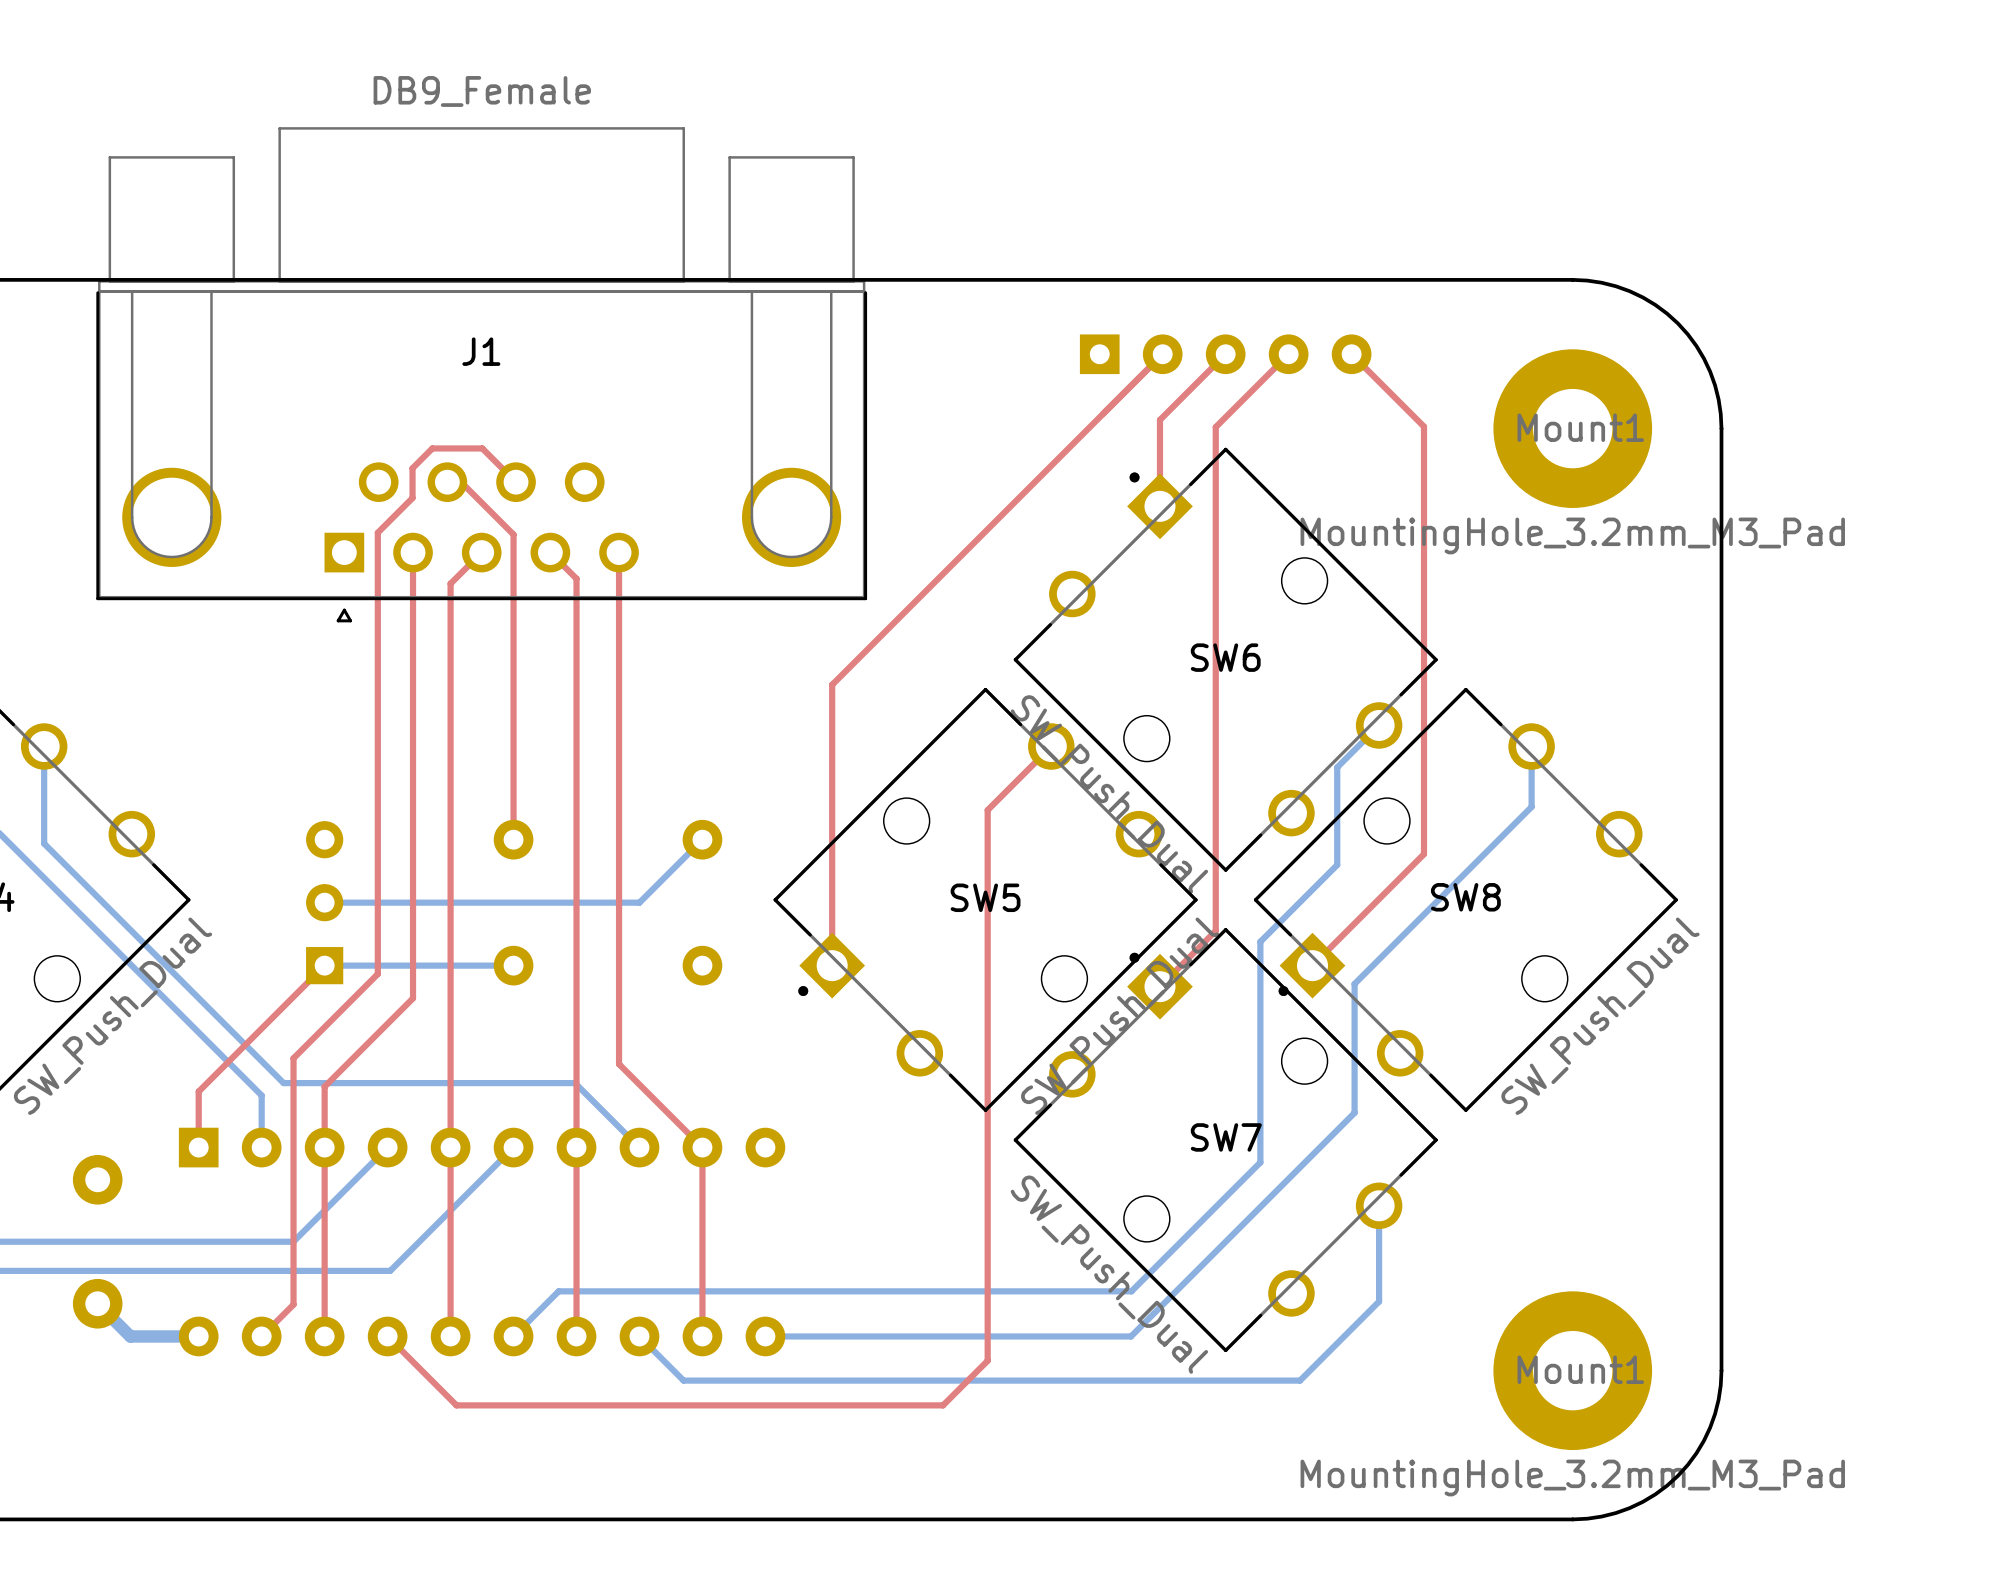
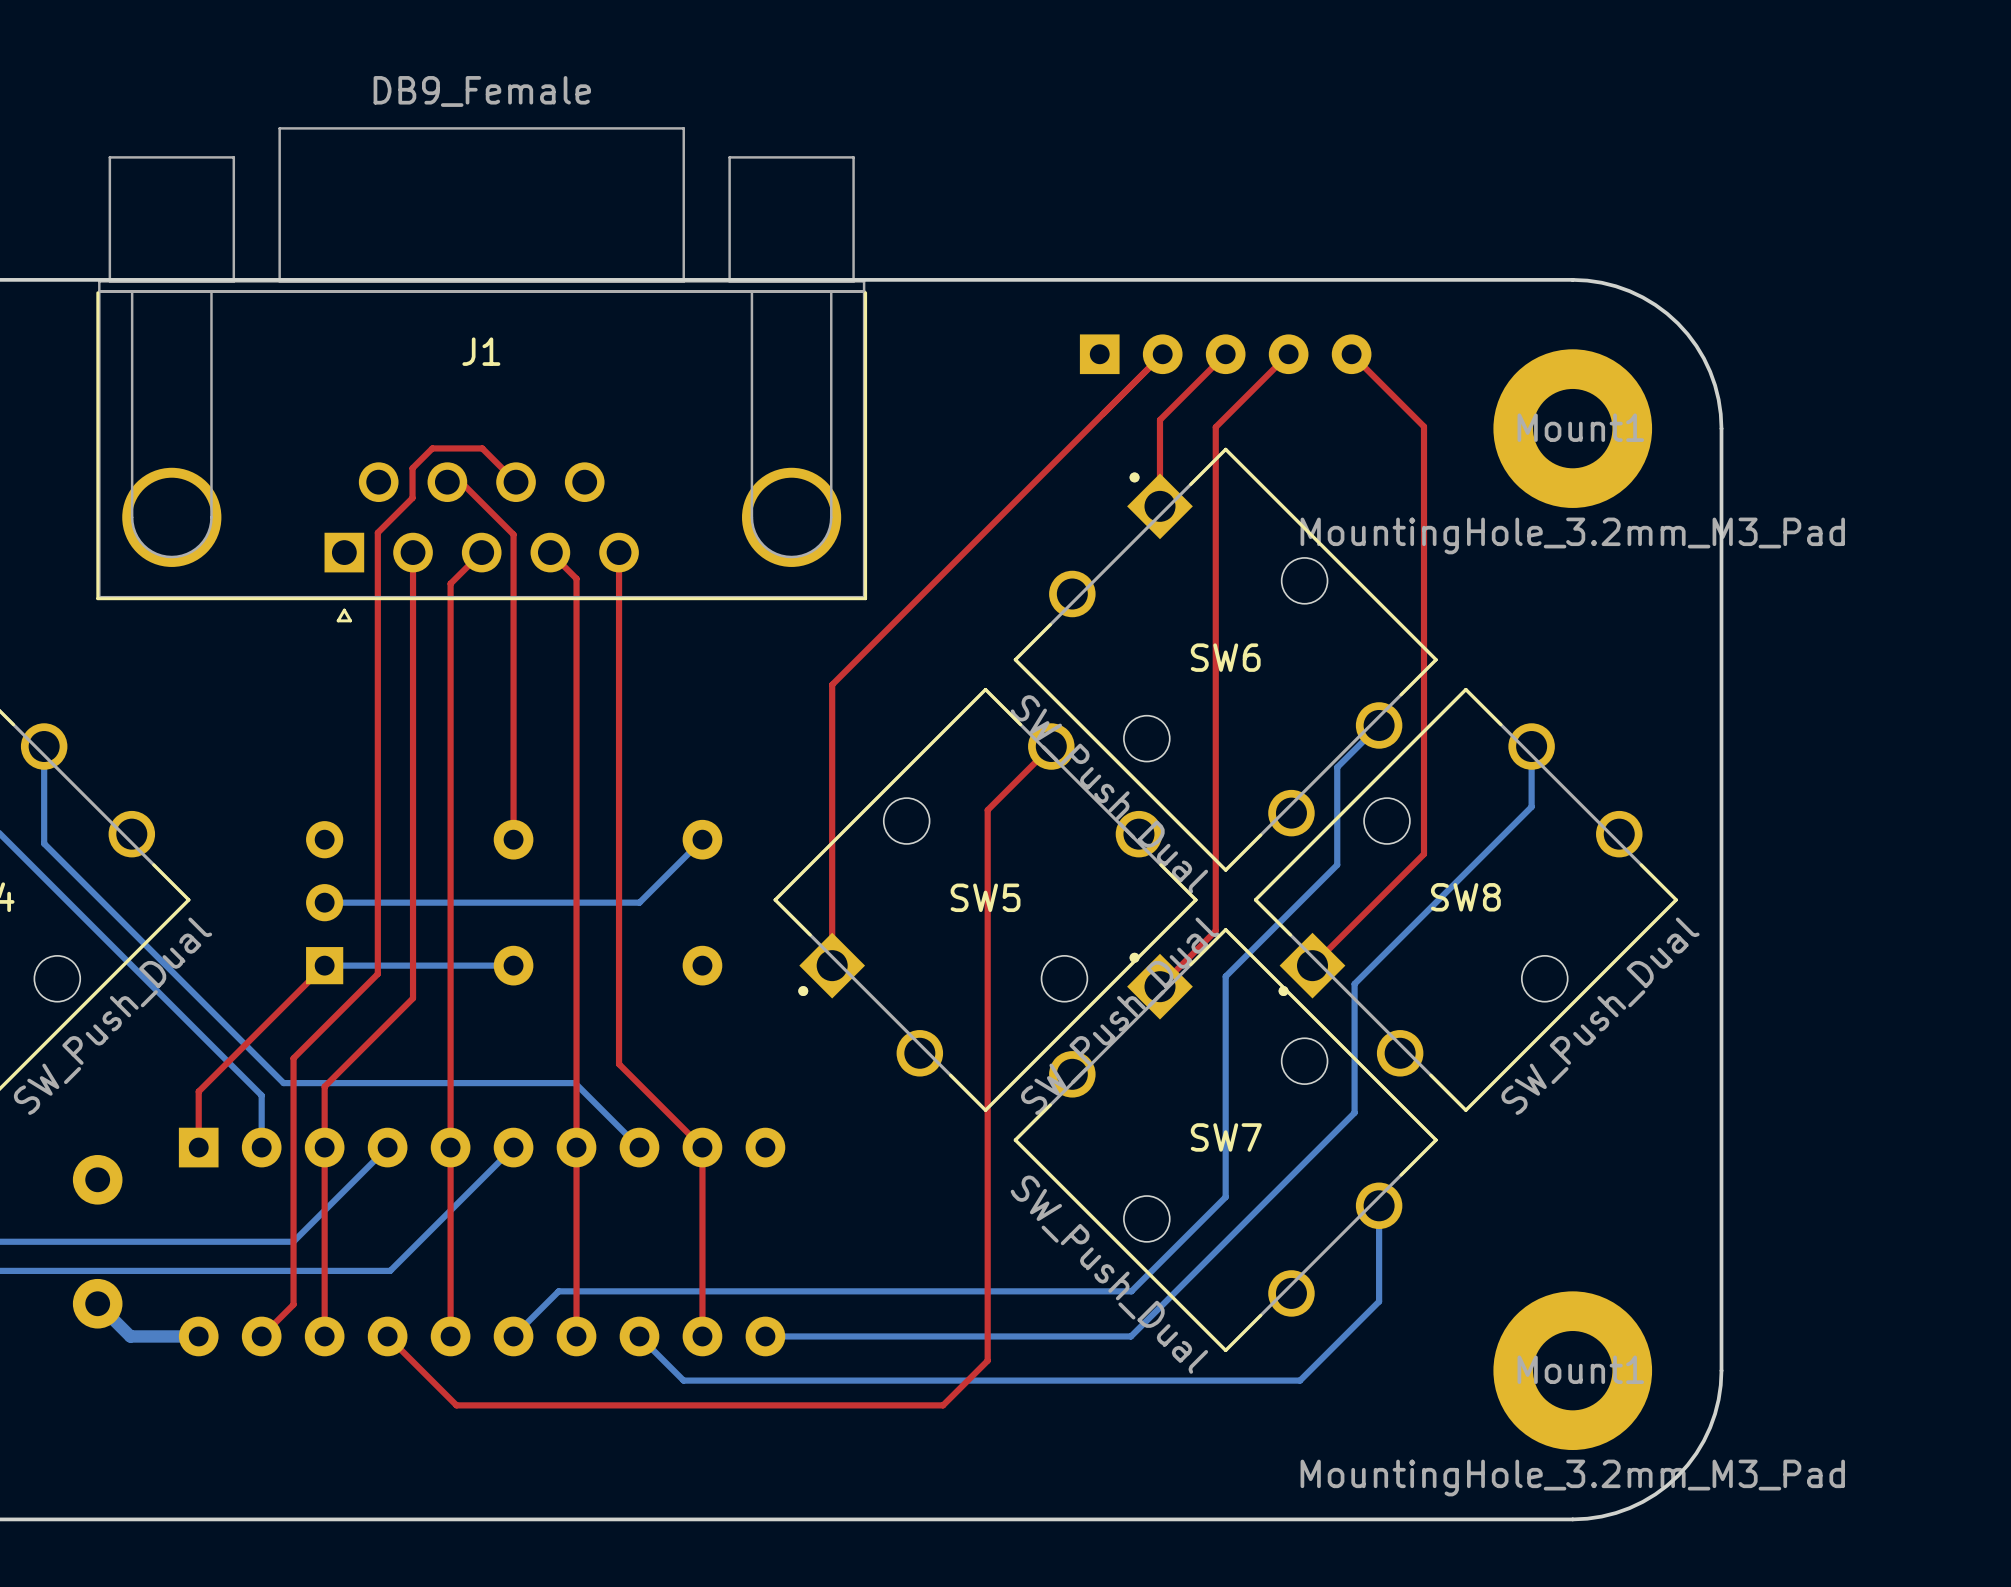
bottom track: (1260, 941) (1260, 1162) (1225, 1197) -> (1260, 941) (1225, 976) (1225, 1197)

